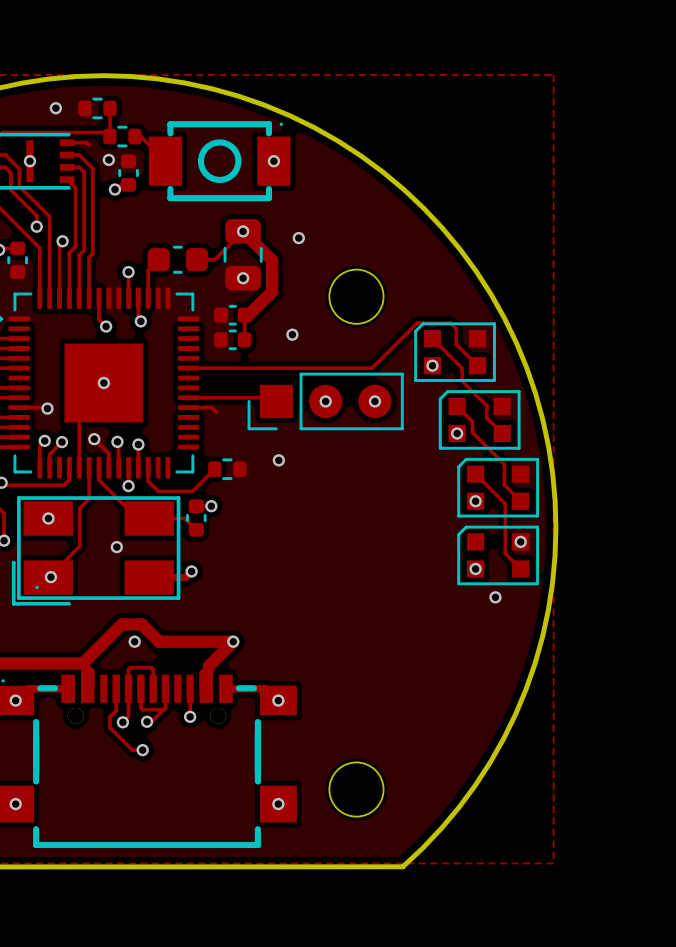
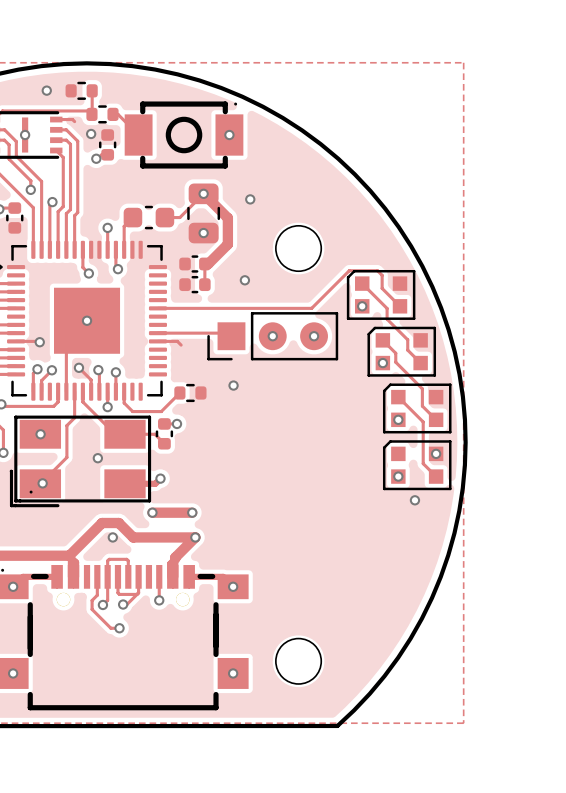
track: none -> (152, 512) (192, 512)
via: none -> (152, 512)
via: none -> (192, 512)

